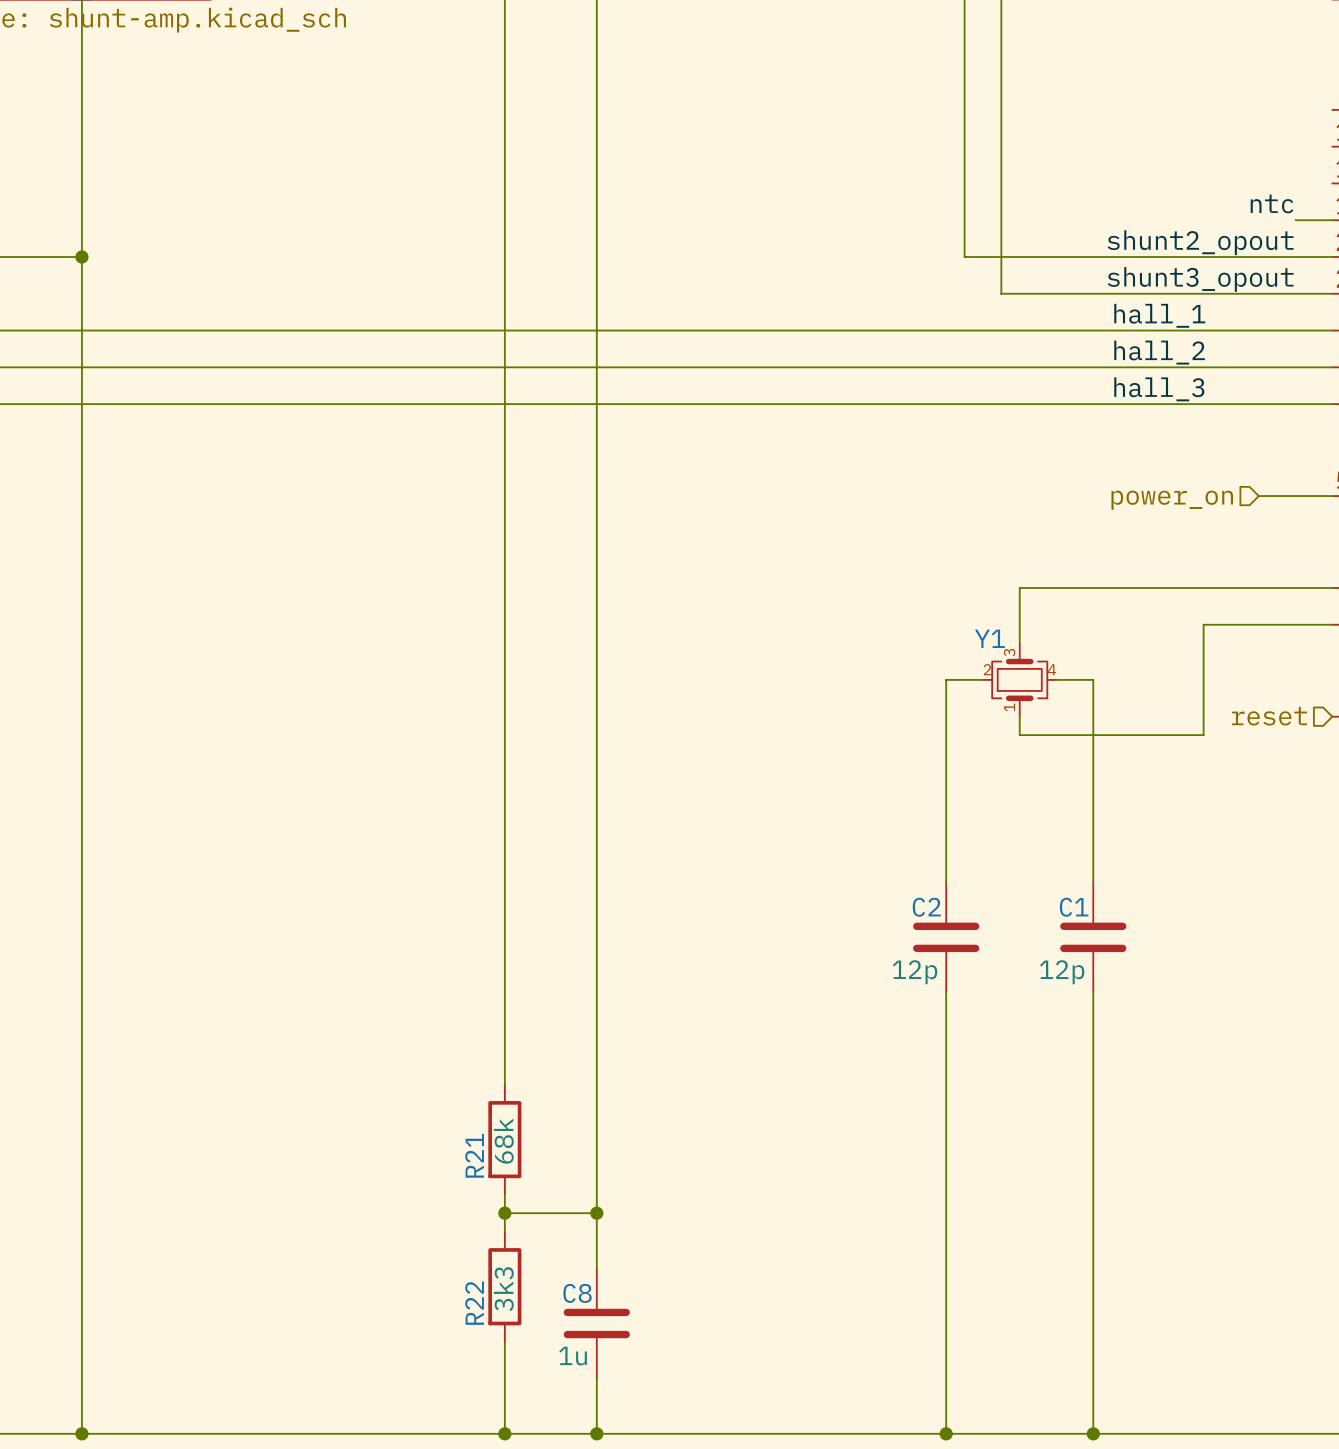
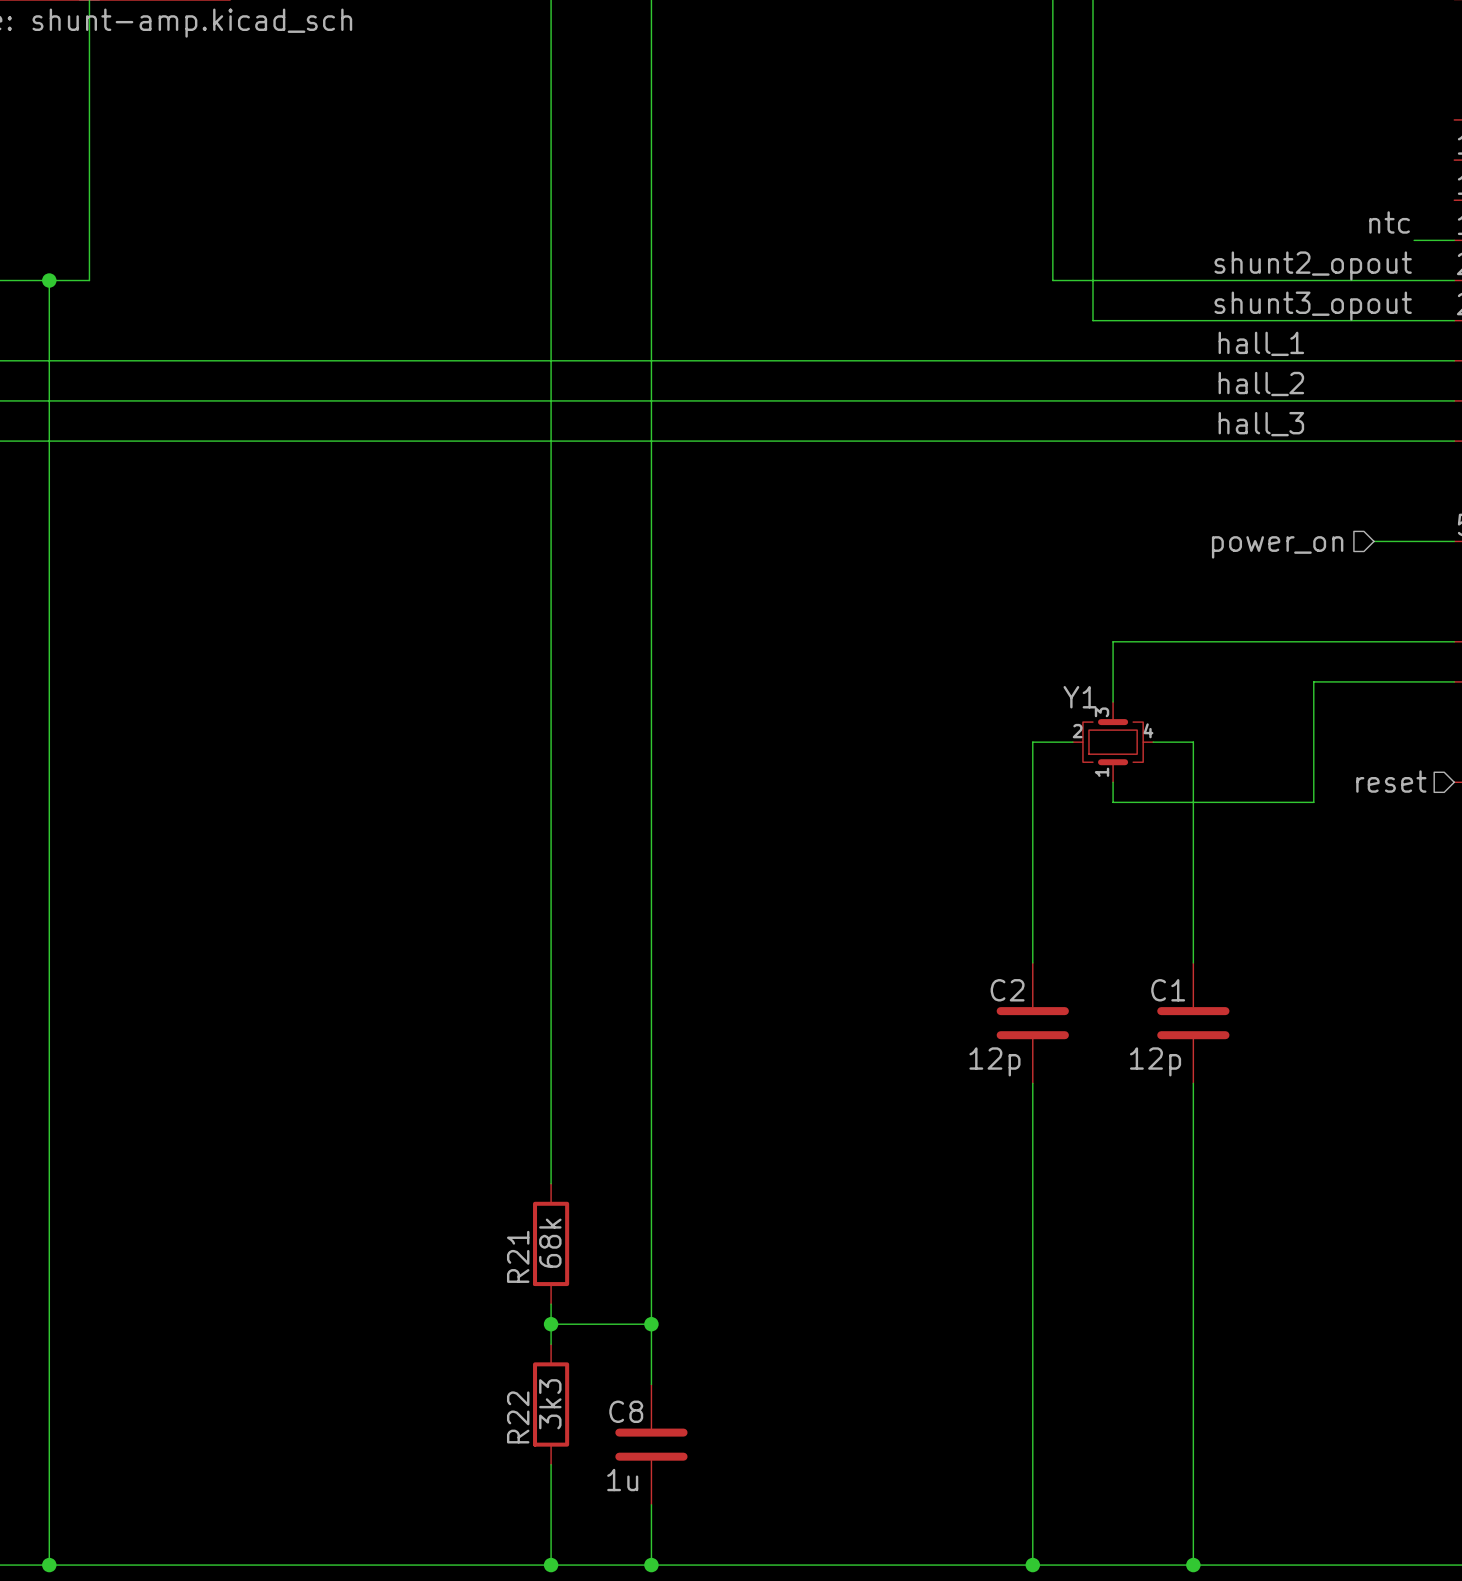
wire: (81, 257) (81, 1433) -> (49, 280) (49, 1565)
junction position: (81, 257) -> (49, 280)
junction position: (81, 1433) -> (49, 1565)

